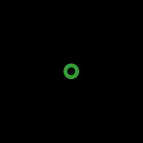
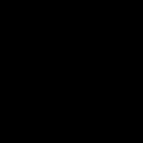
via: (71, 71) -> none

